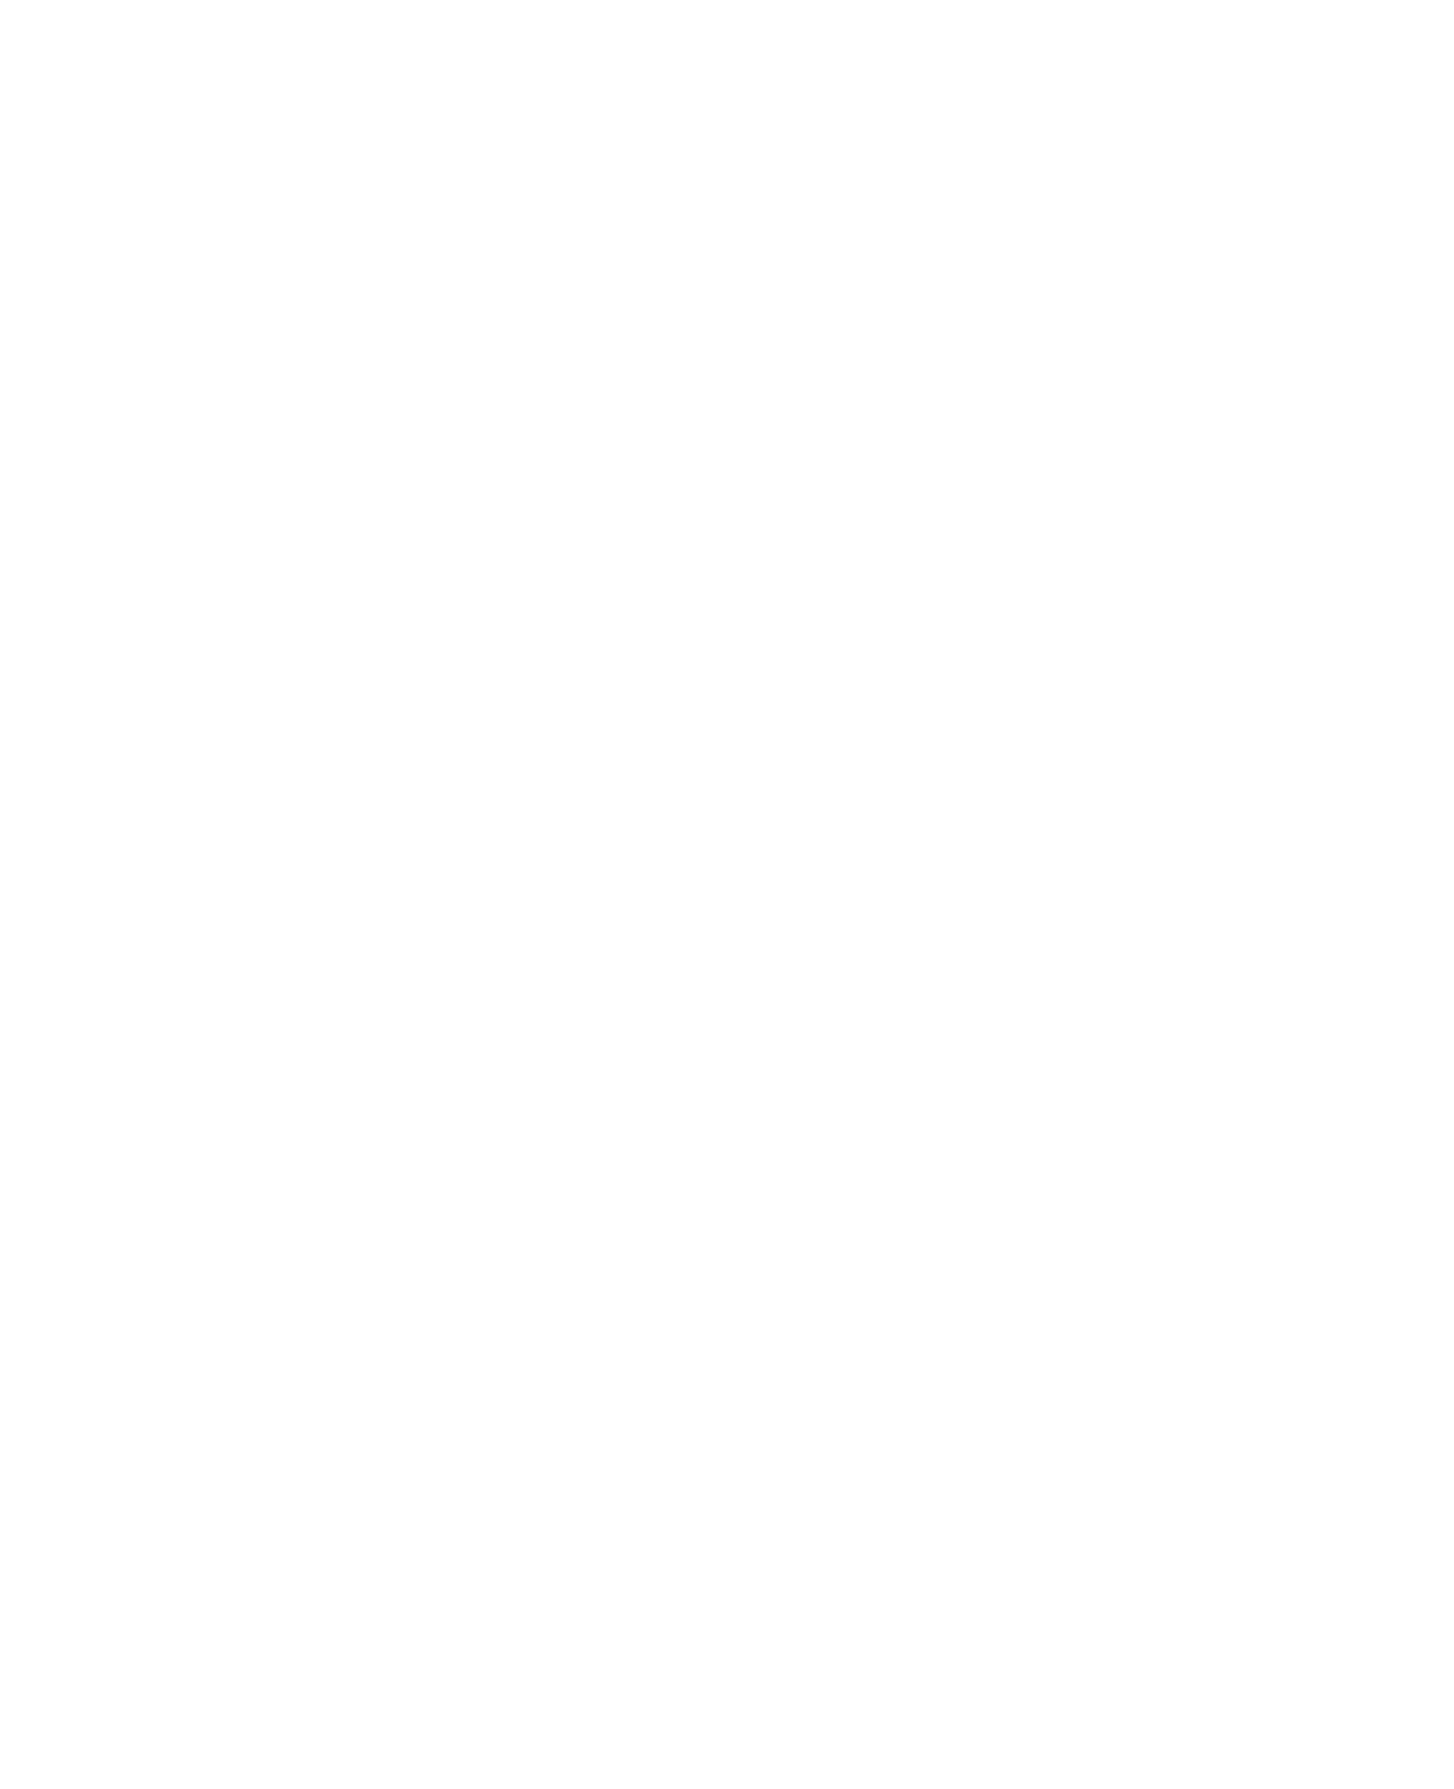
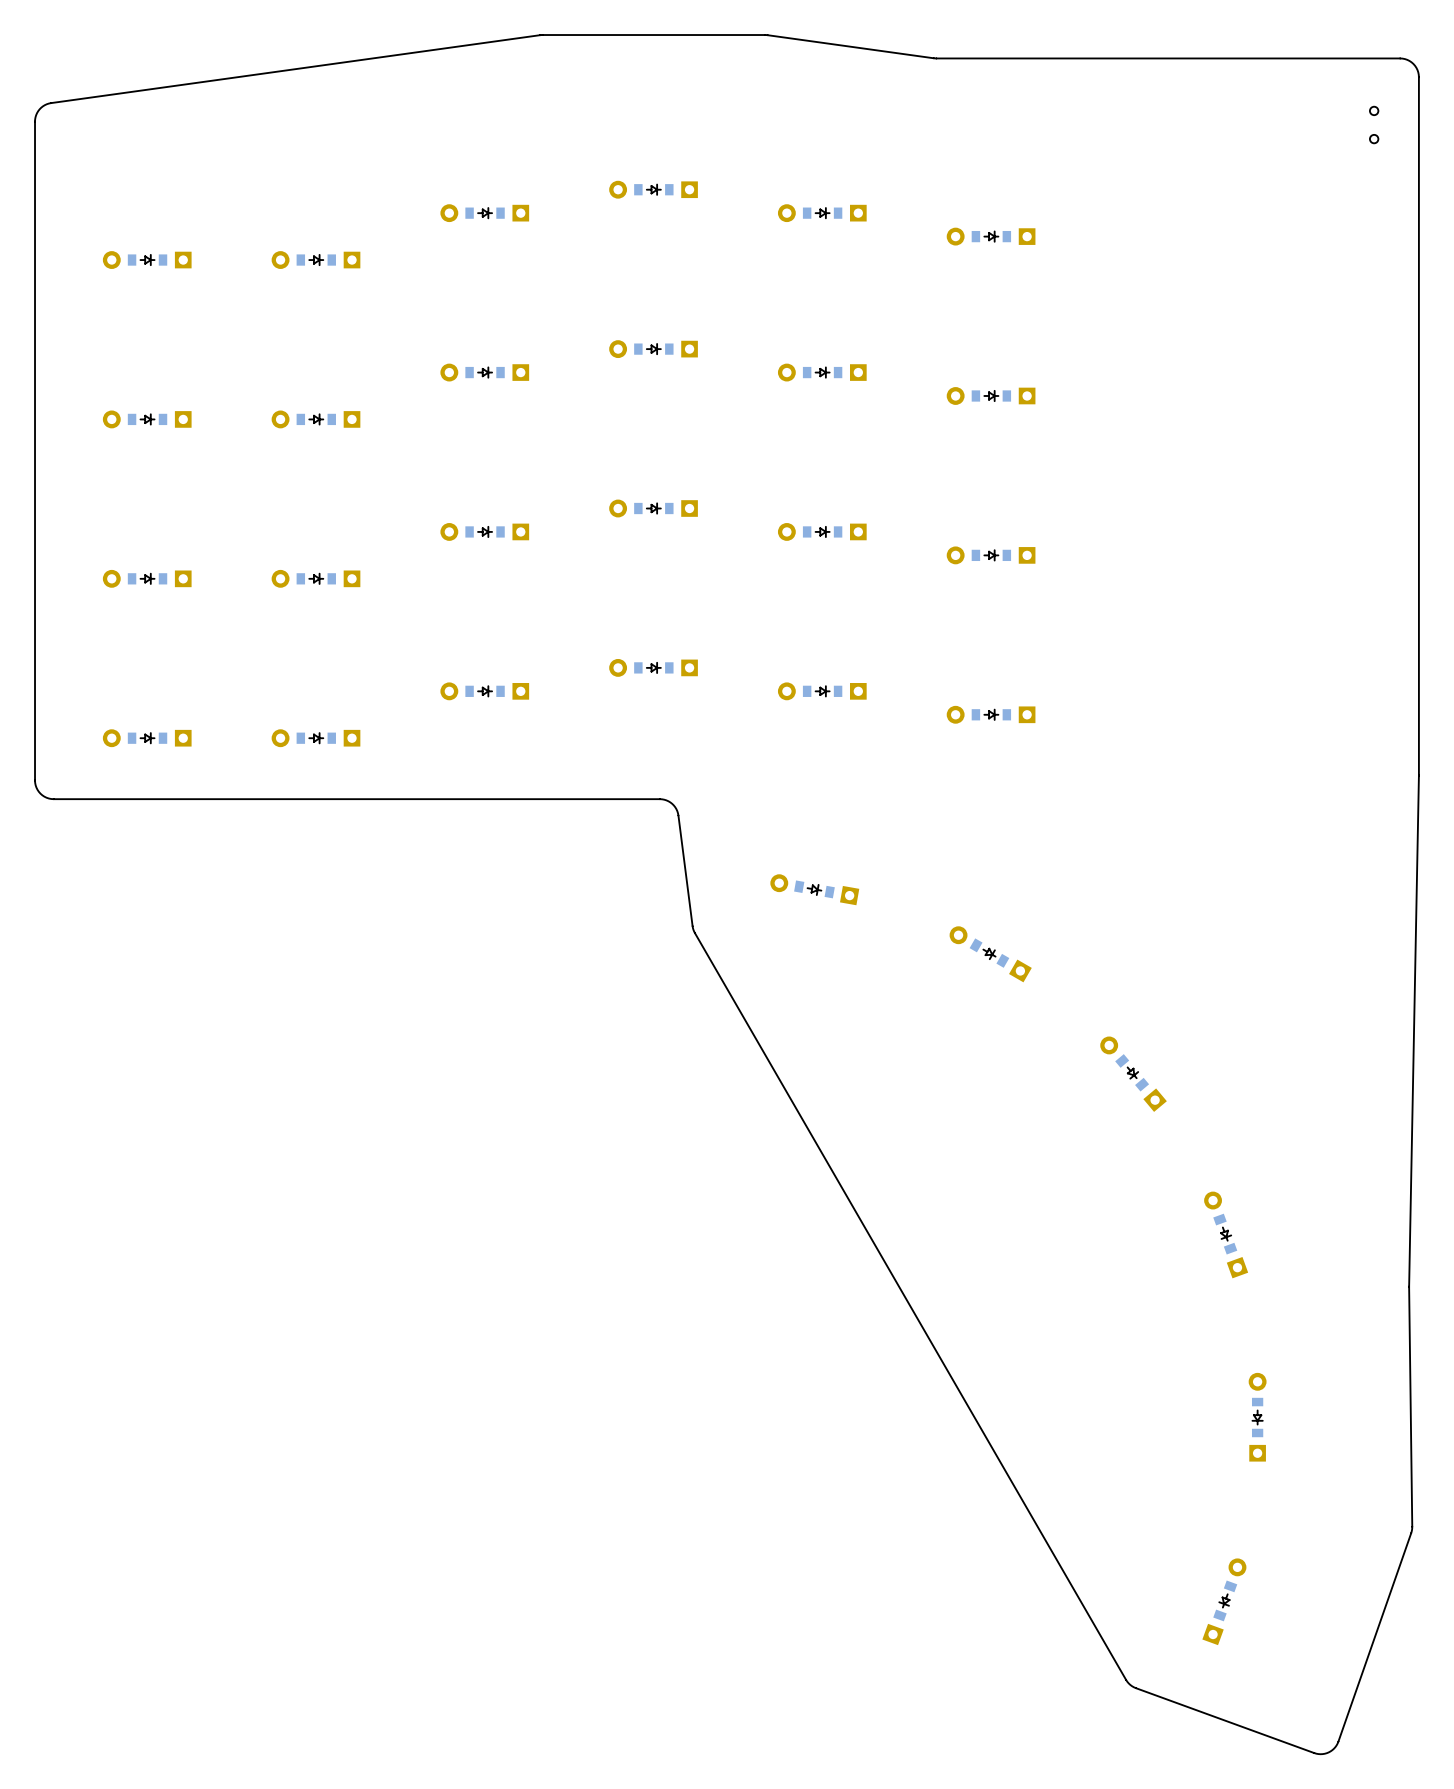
board edge: none -> (765, 35) (541, 35) (51, 103) (39, 109) (35, 121) (35, 785) (42, 795) (53, 799) (659, 799) (670, 802) (676, 809) (678, 815) (694, 933) (1127, 1681) (1135, 1688) (1314, 1753) (1326, 1753) (1333, 1748) (1338, 1741) (1412, 1528) (1409, 1286) (1418, 775) (1418, 72) (1411, 62) (1400, 58) (935, 58) (765, 35)
part: none -> (1374, 125)
part: none -> (653, 189)
part: none -> (484, 213)
part: none -> (822, 213)
part: none -> (991, 236)
part: none -> (147, 260)
part: none -> (316, 260)
part: none -> (653, 349)
part: none -> (484, 372)
part: none -> (822, 372)
part: none -> (991, 395)
part: none -> (147, 419)
part: none -> (316, 419)
part: none -> (653, 508)
part: none -> (484, 531)
part: none -> (822, 531)
part: none -> (991, 555)
part: none -> (147, 578)
part: none -> (316, 578)
part: none -> (653, 667)
part: none -> (484, 691)
part: none -> (822, 691)
part: none -> (991, 714)
part: none -> (147, 738)
part: none -> (316, 738)
part: none -> (814, 889)
part: none -> (990, 954)
part: none -> (1133, 1074)
part: none -> (1226, 1234)
part: none -> (1257, 1417)
part: none -> (1224, 1601)

